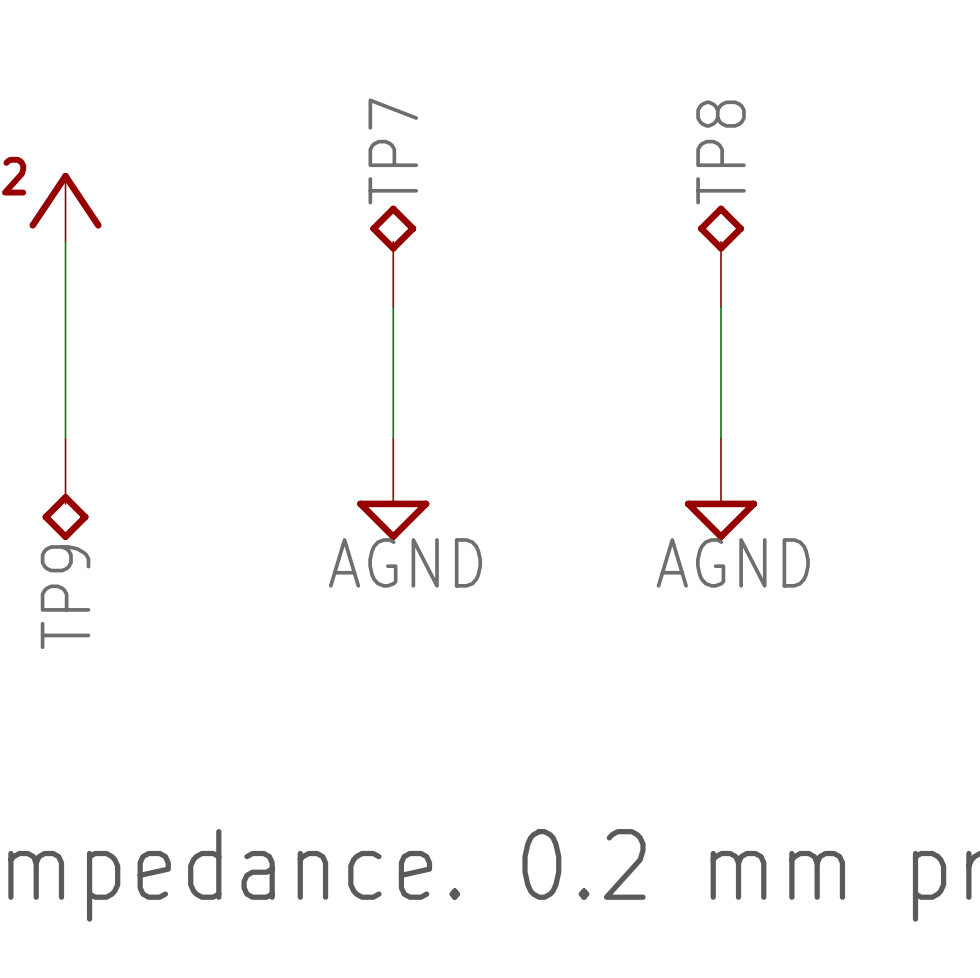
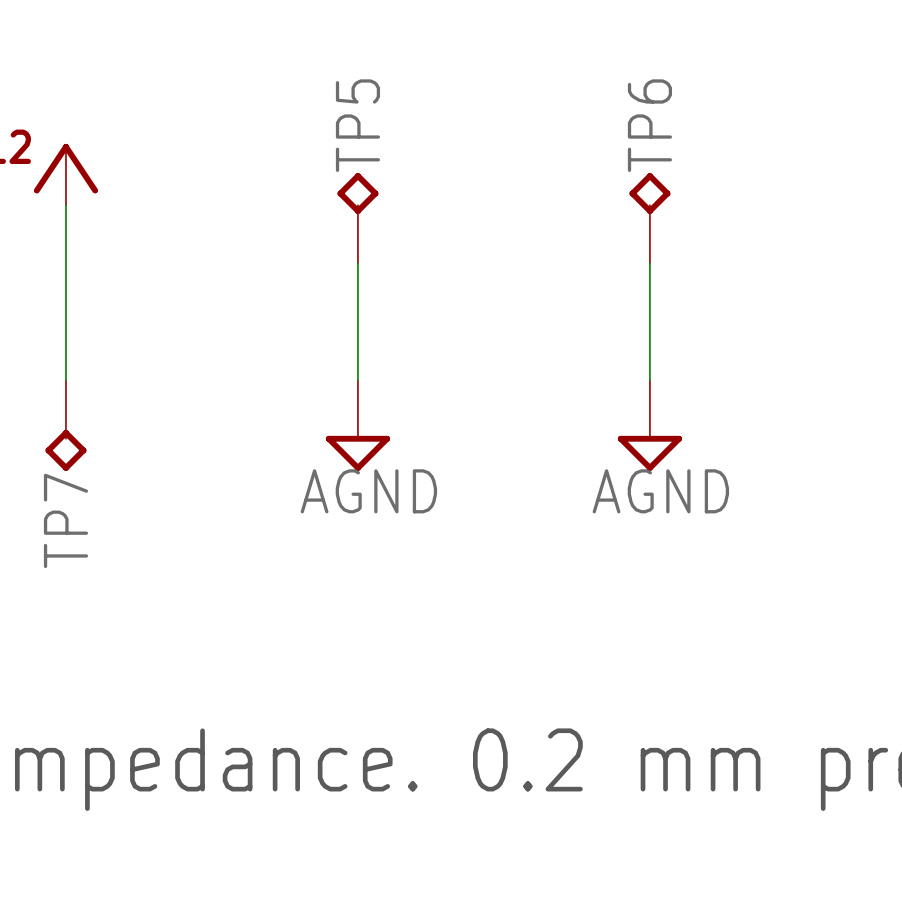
TP7 name: TP7 (393, 151) -> TP5 (357, 125)
TP8 name: TP8 (721, 152) -> TP6 (649, 125)
TP9 name: TP9 (65, 597) -> TP7 (65, 520)

